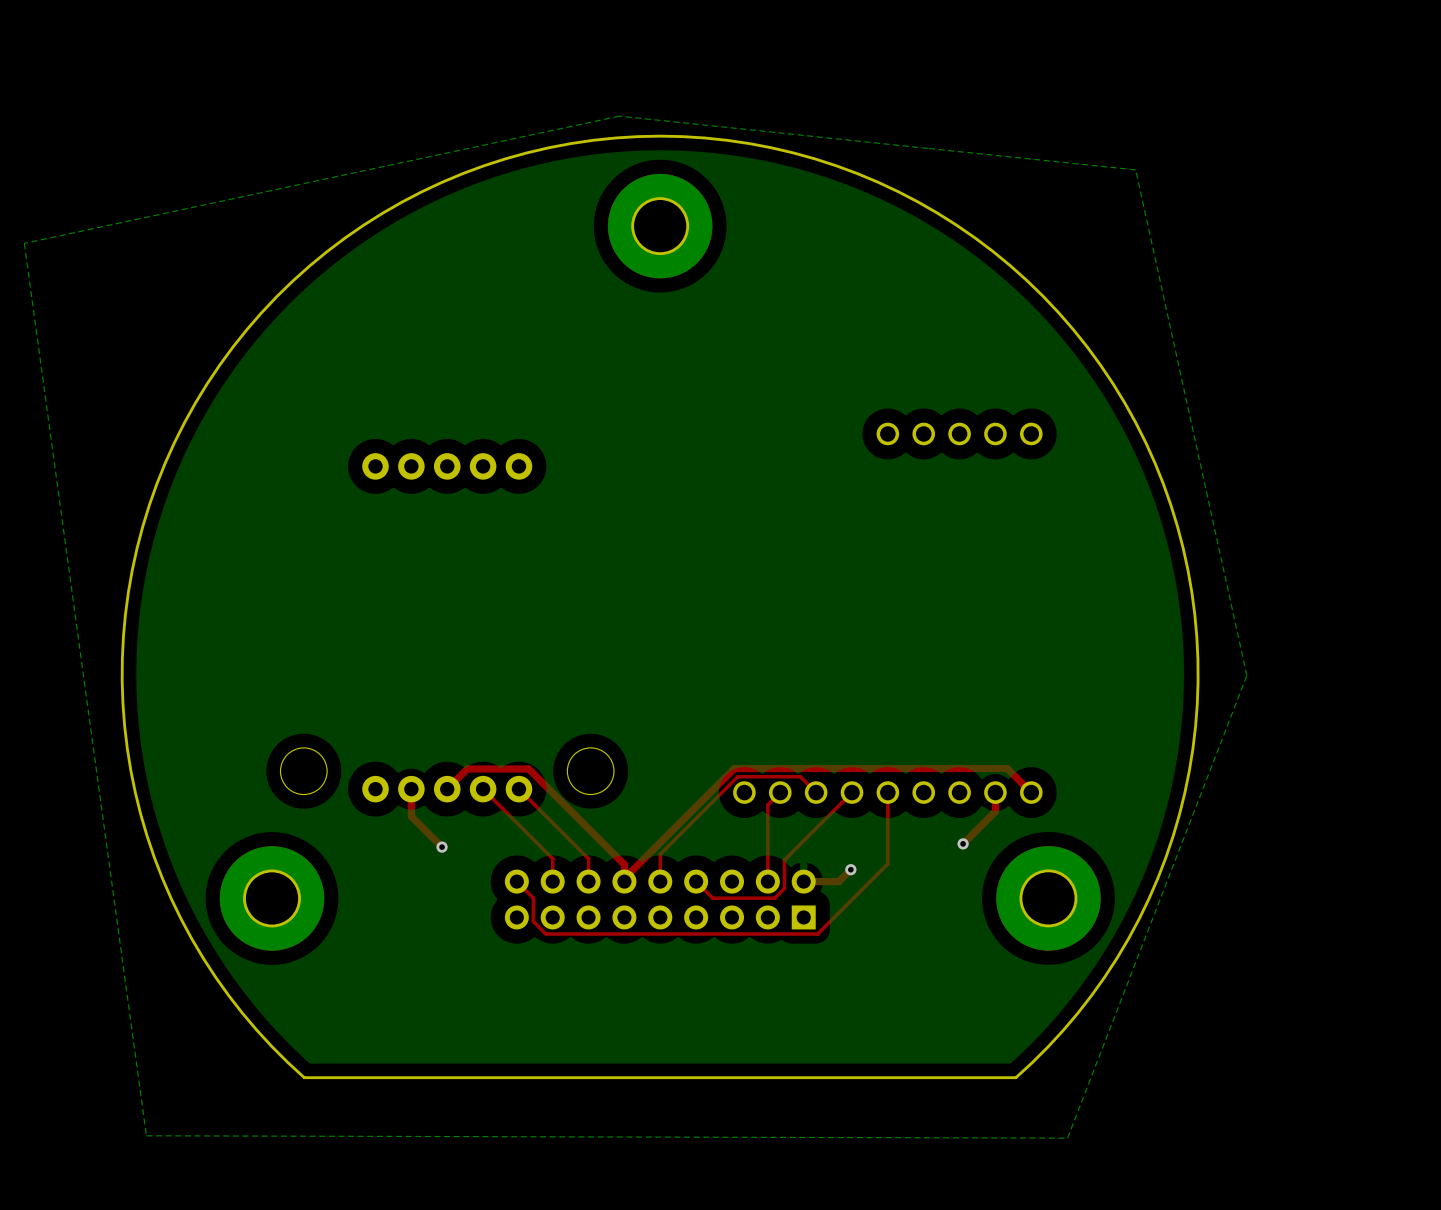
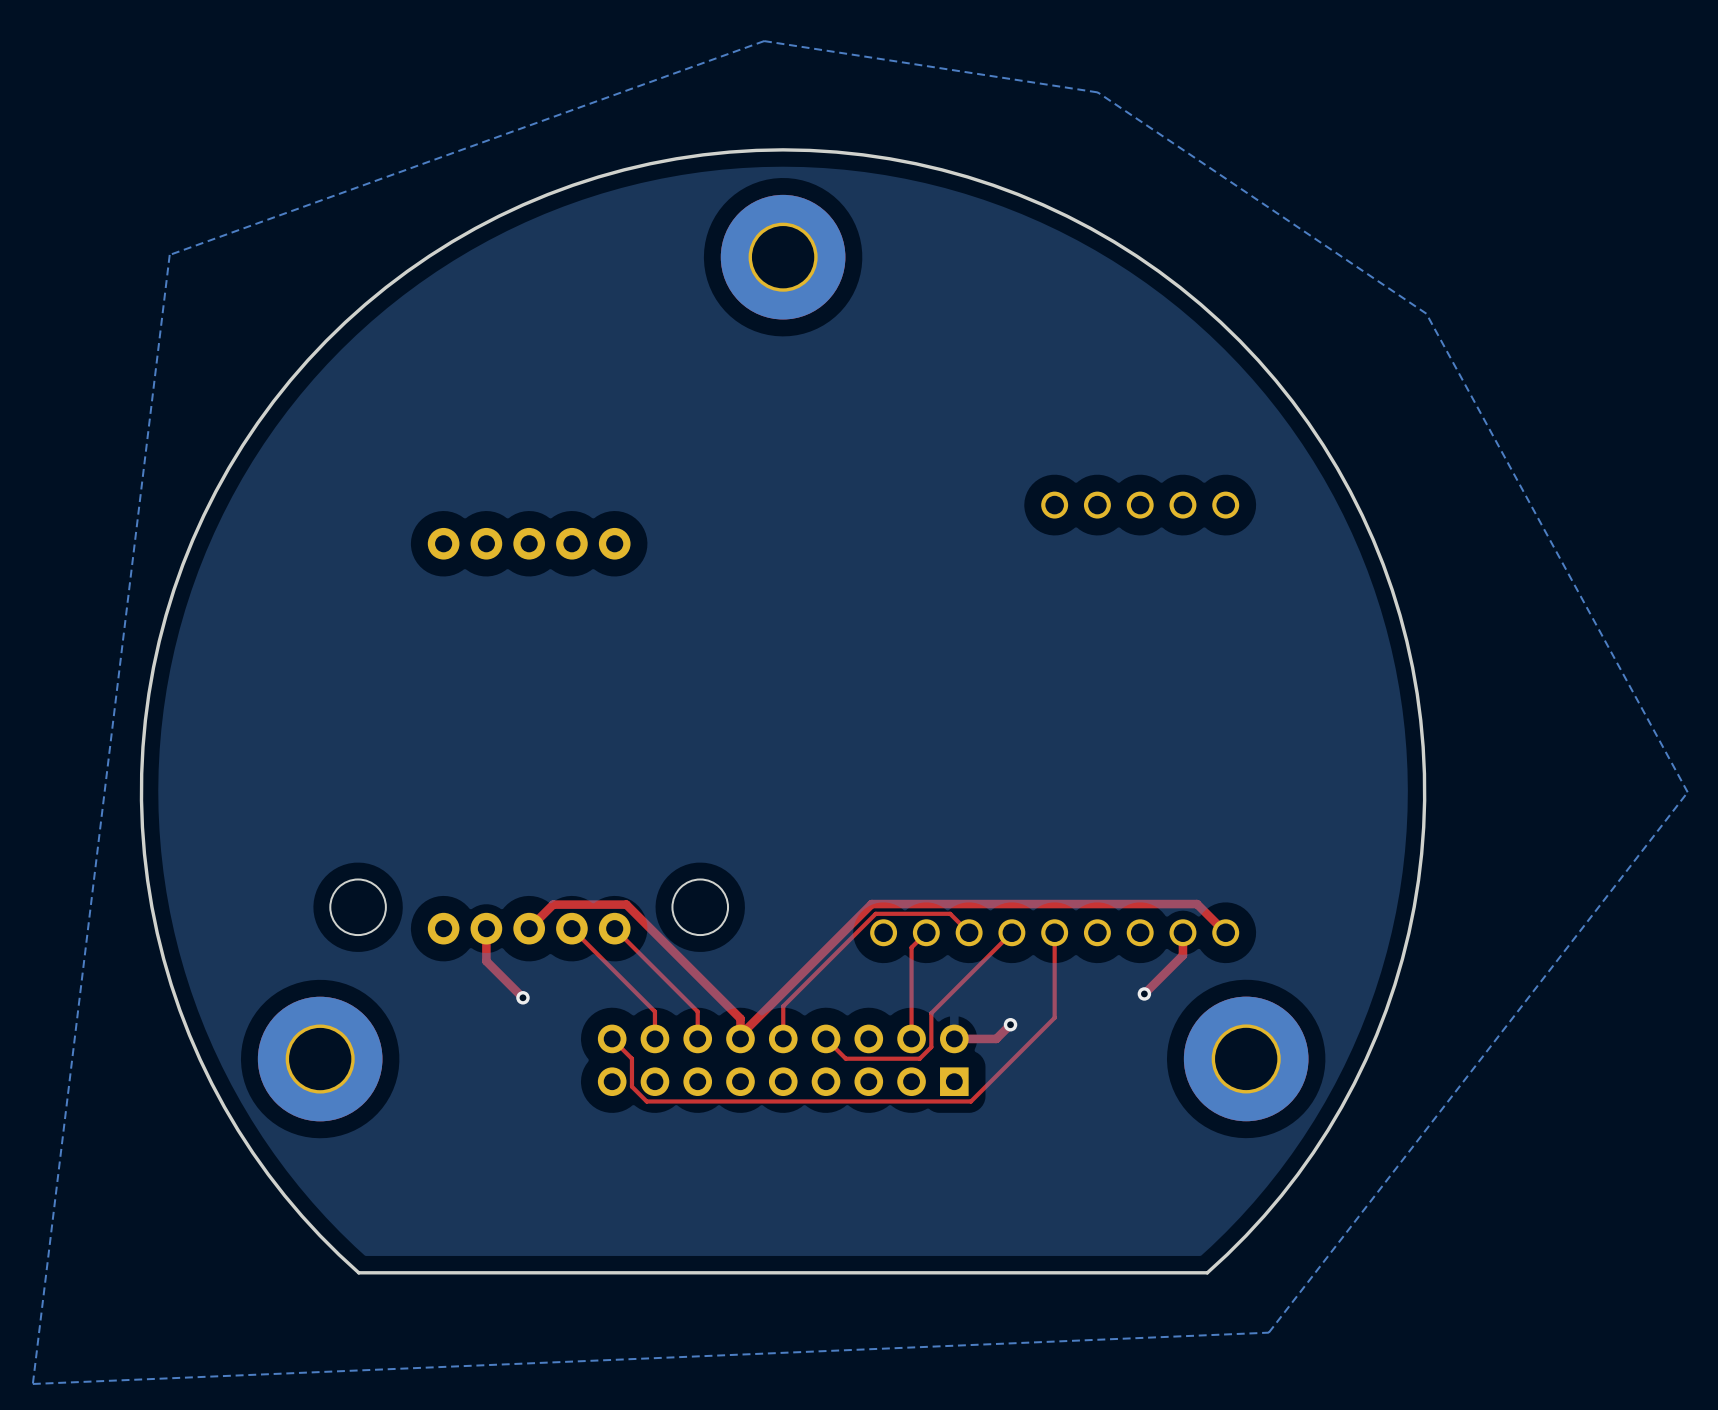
bottom zone outline: (619, 116) (1135, 169) (1246, 675) (1067, 1138) (146, 1135) (24, 243) (619, 116) -> (764, 41) (1097, 92) (1426, 313) (1687, 792) (1268, 1332) (32, 1383) (169, 254) (764, 41)

